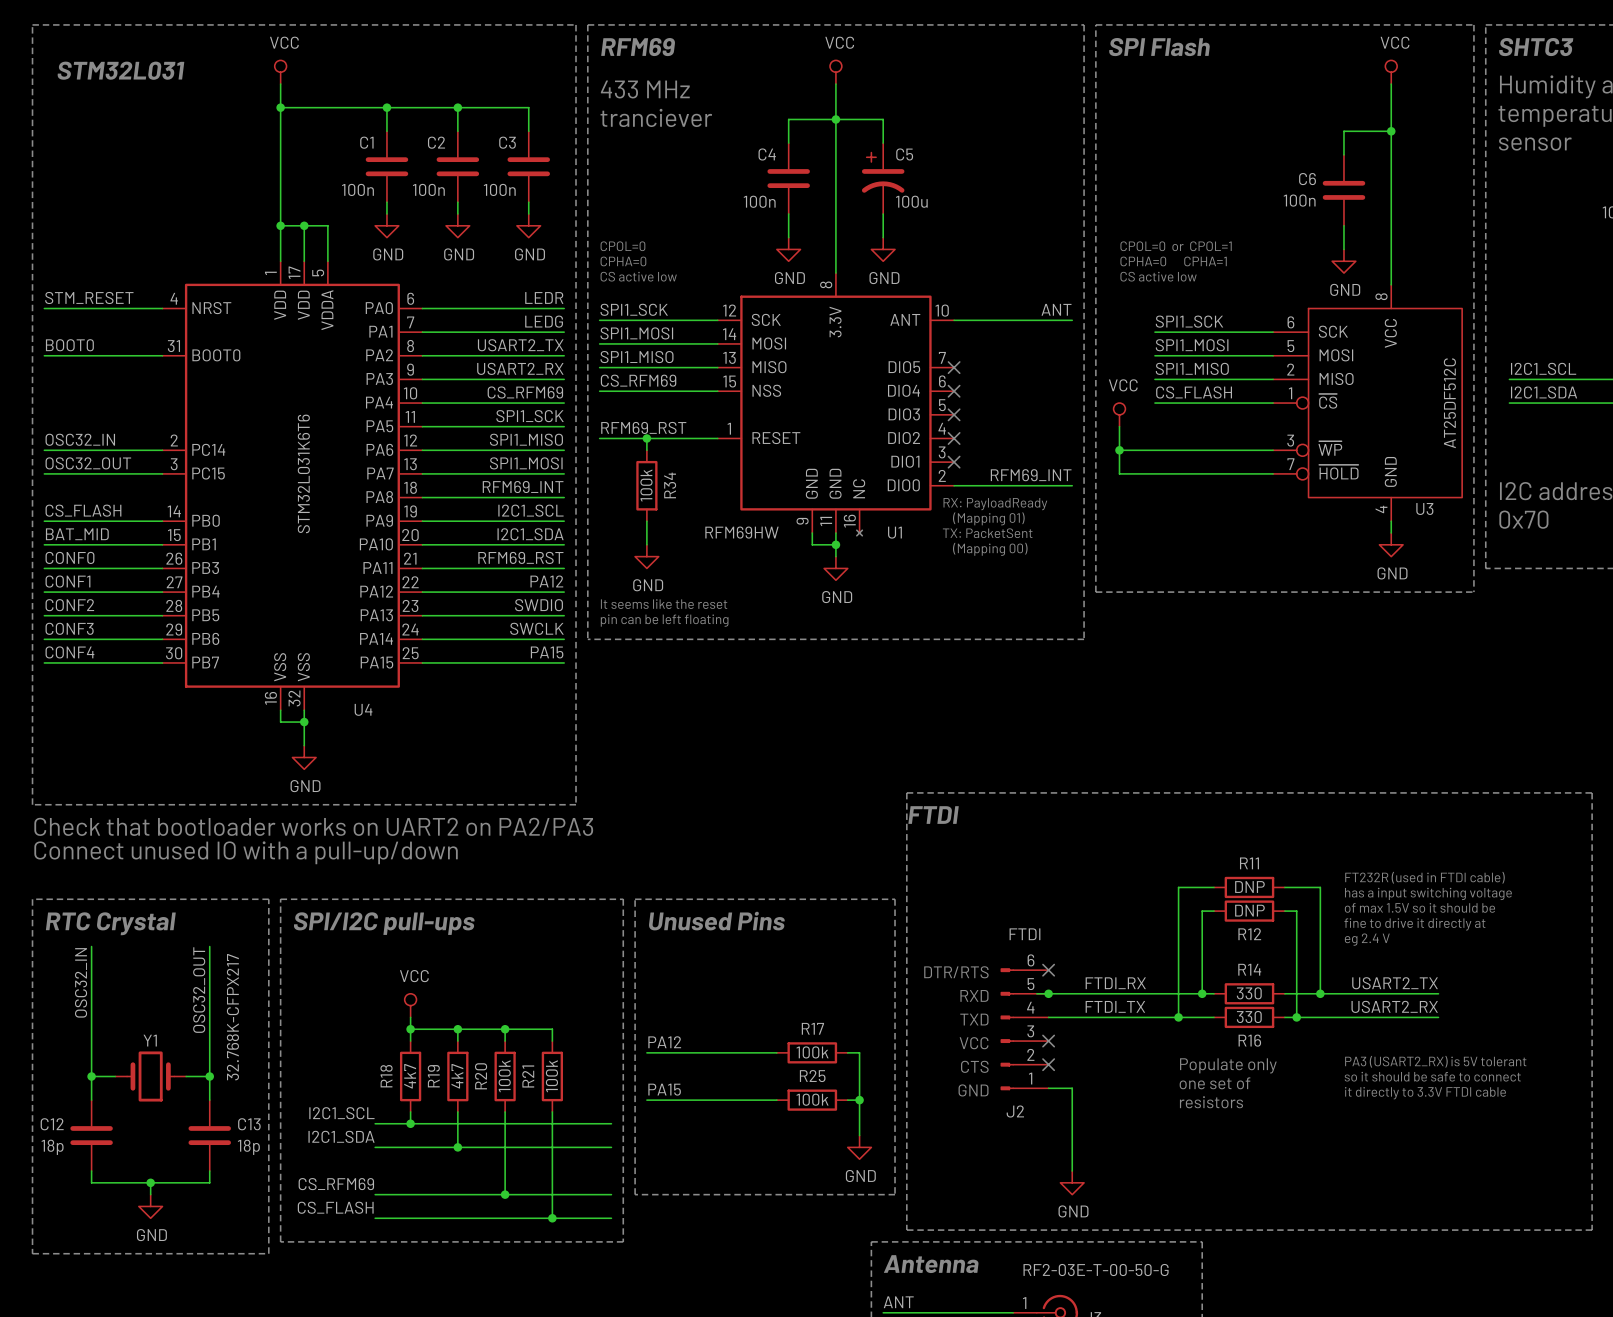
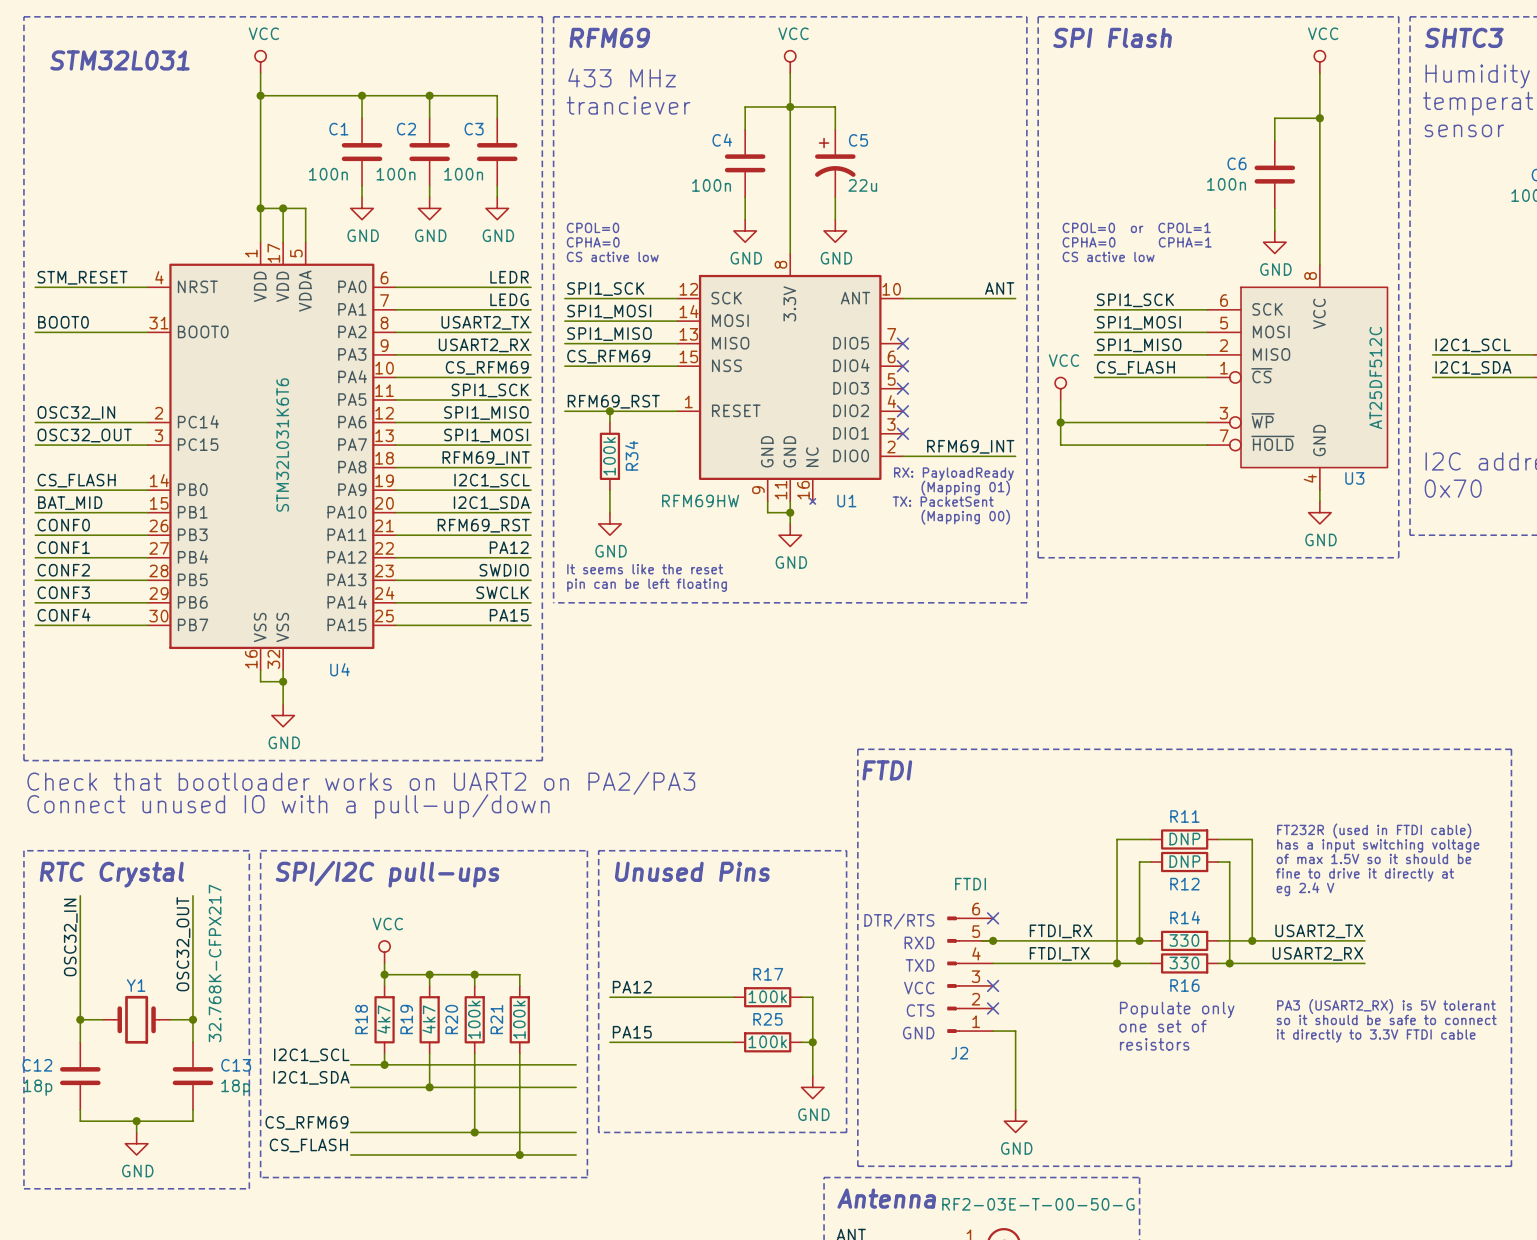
C5 value: 100u (911, 201) -> 22u (862, 185)

